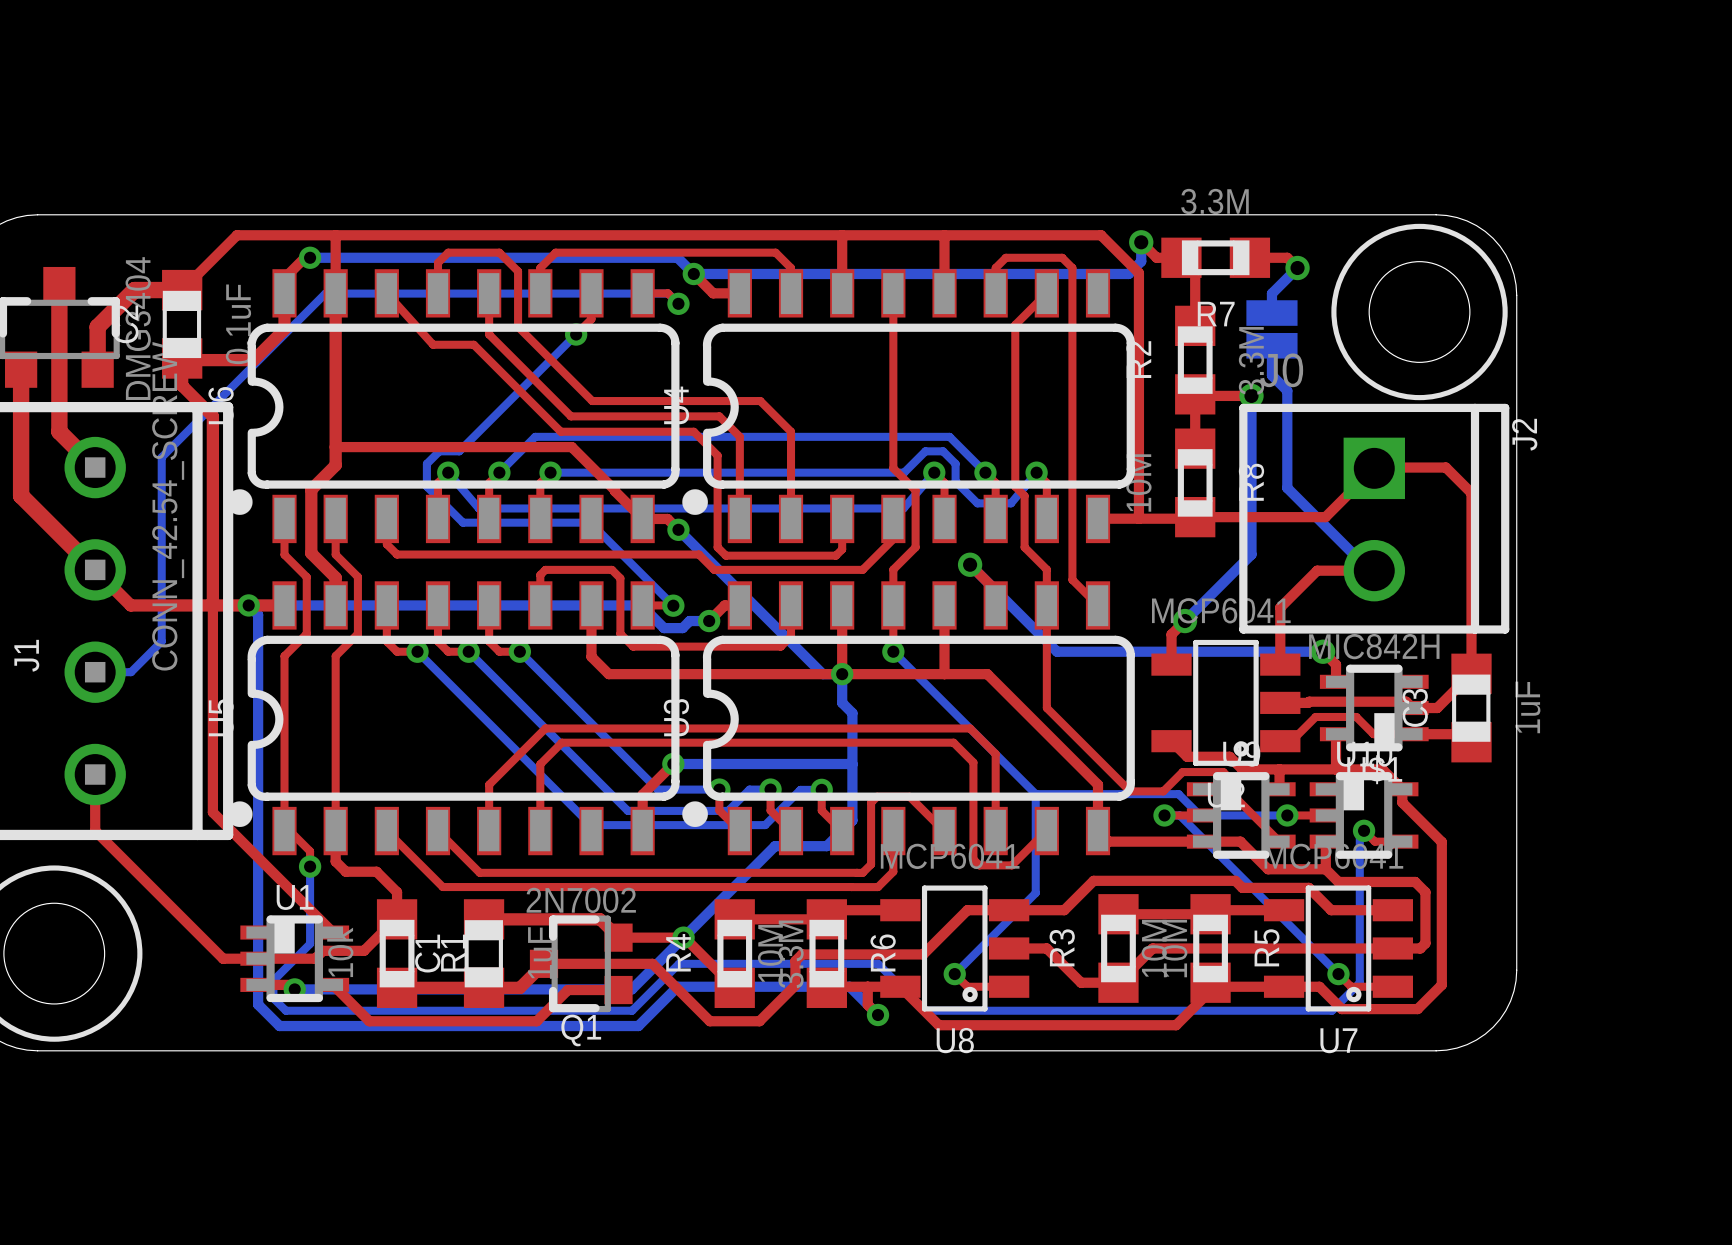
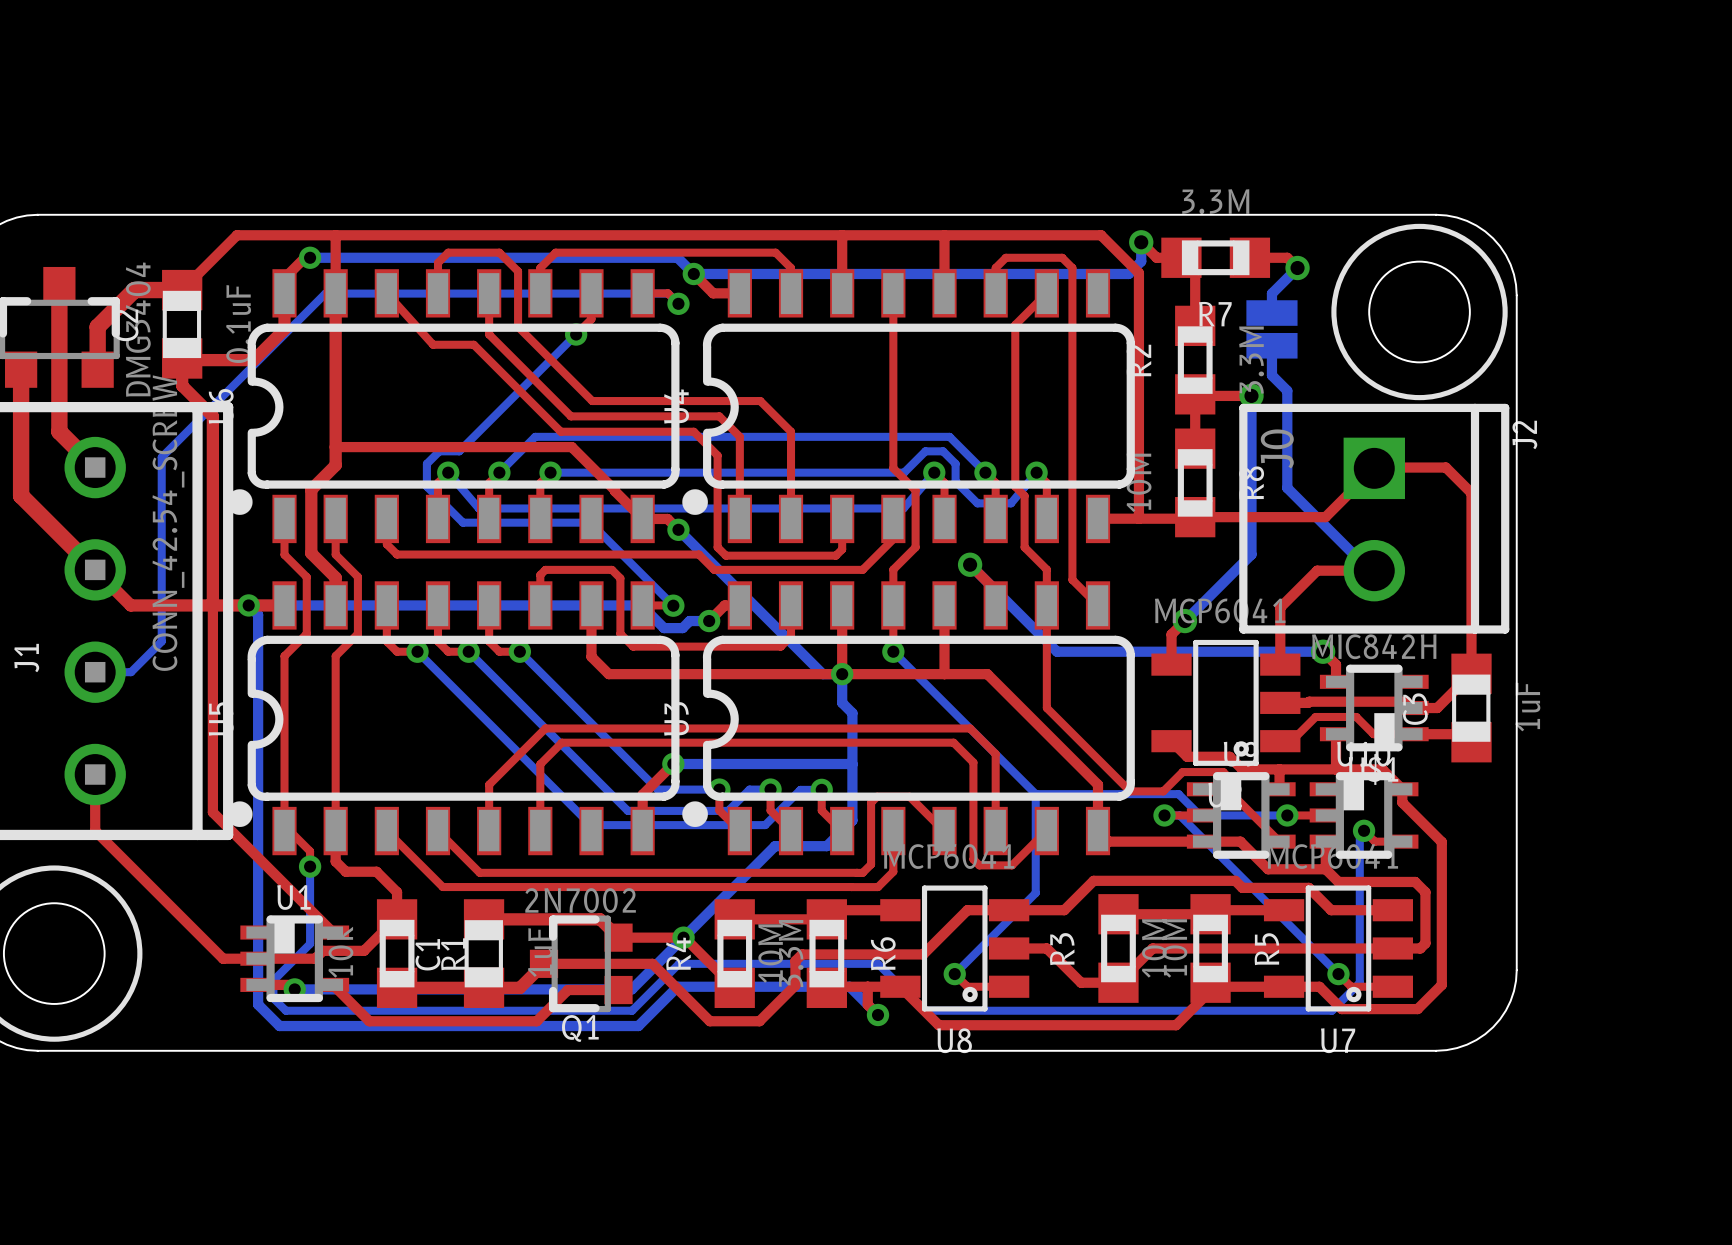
text rotation: 0° (1281, 370) -> 90° counterclockwise (1277, 448)
text position: J0 (1281, 370) -> J0 (1277, 448)

